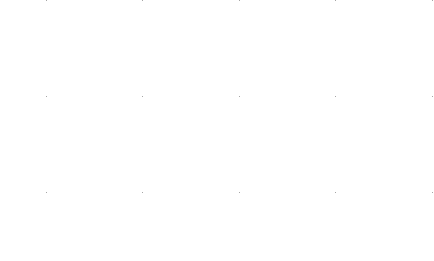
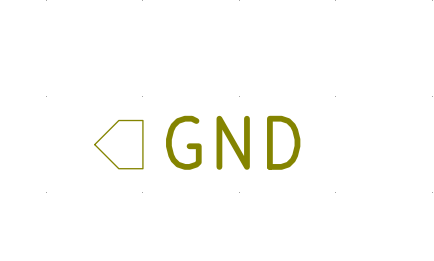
hierarchical label: none -> GND (233, 142)

